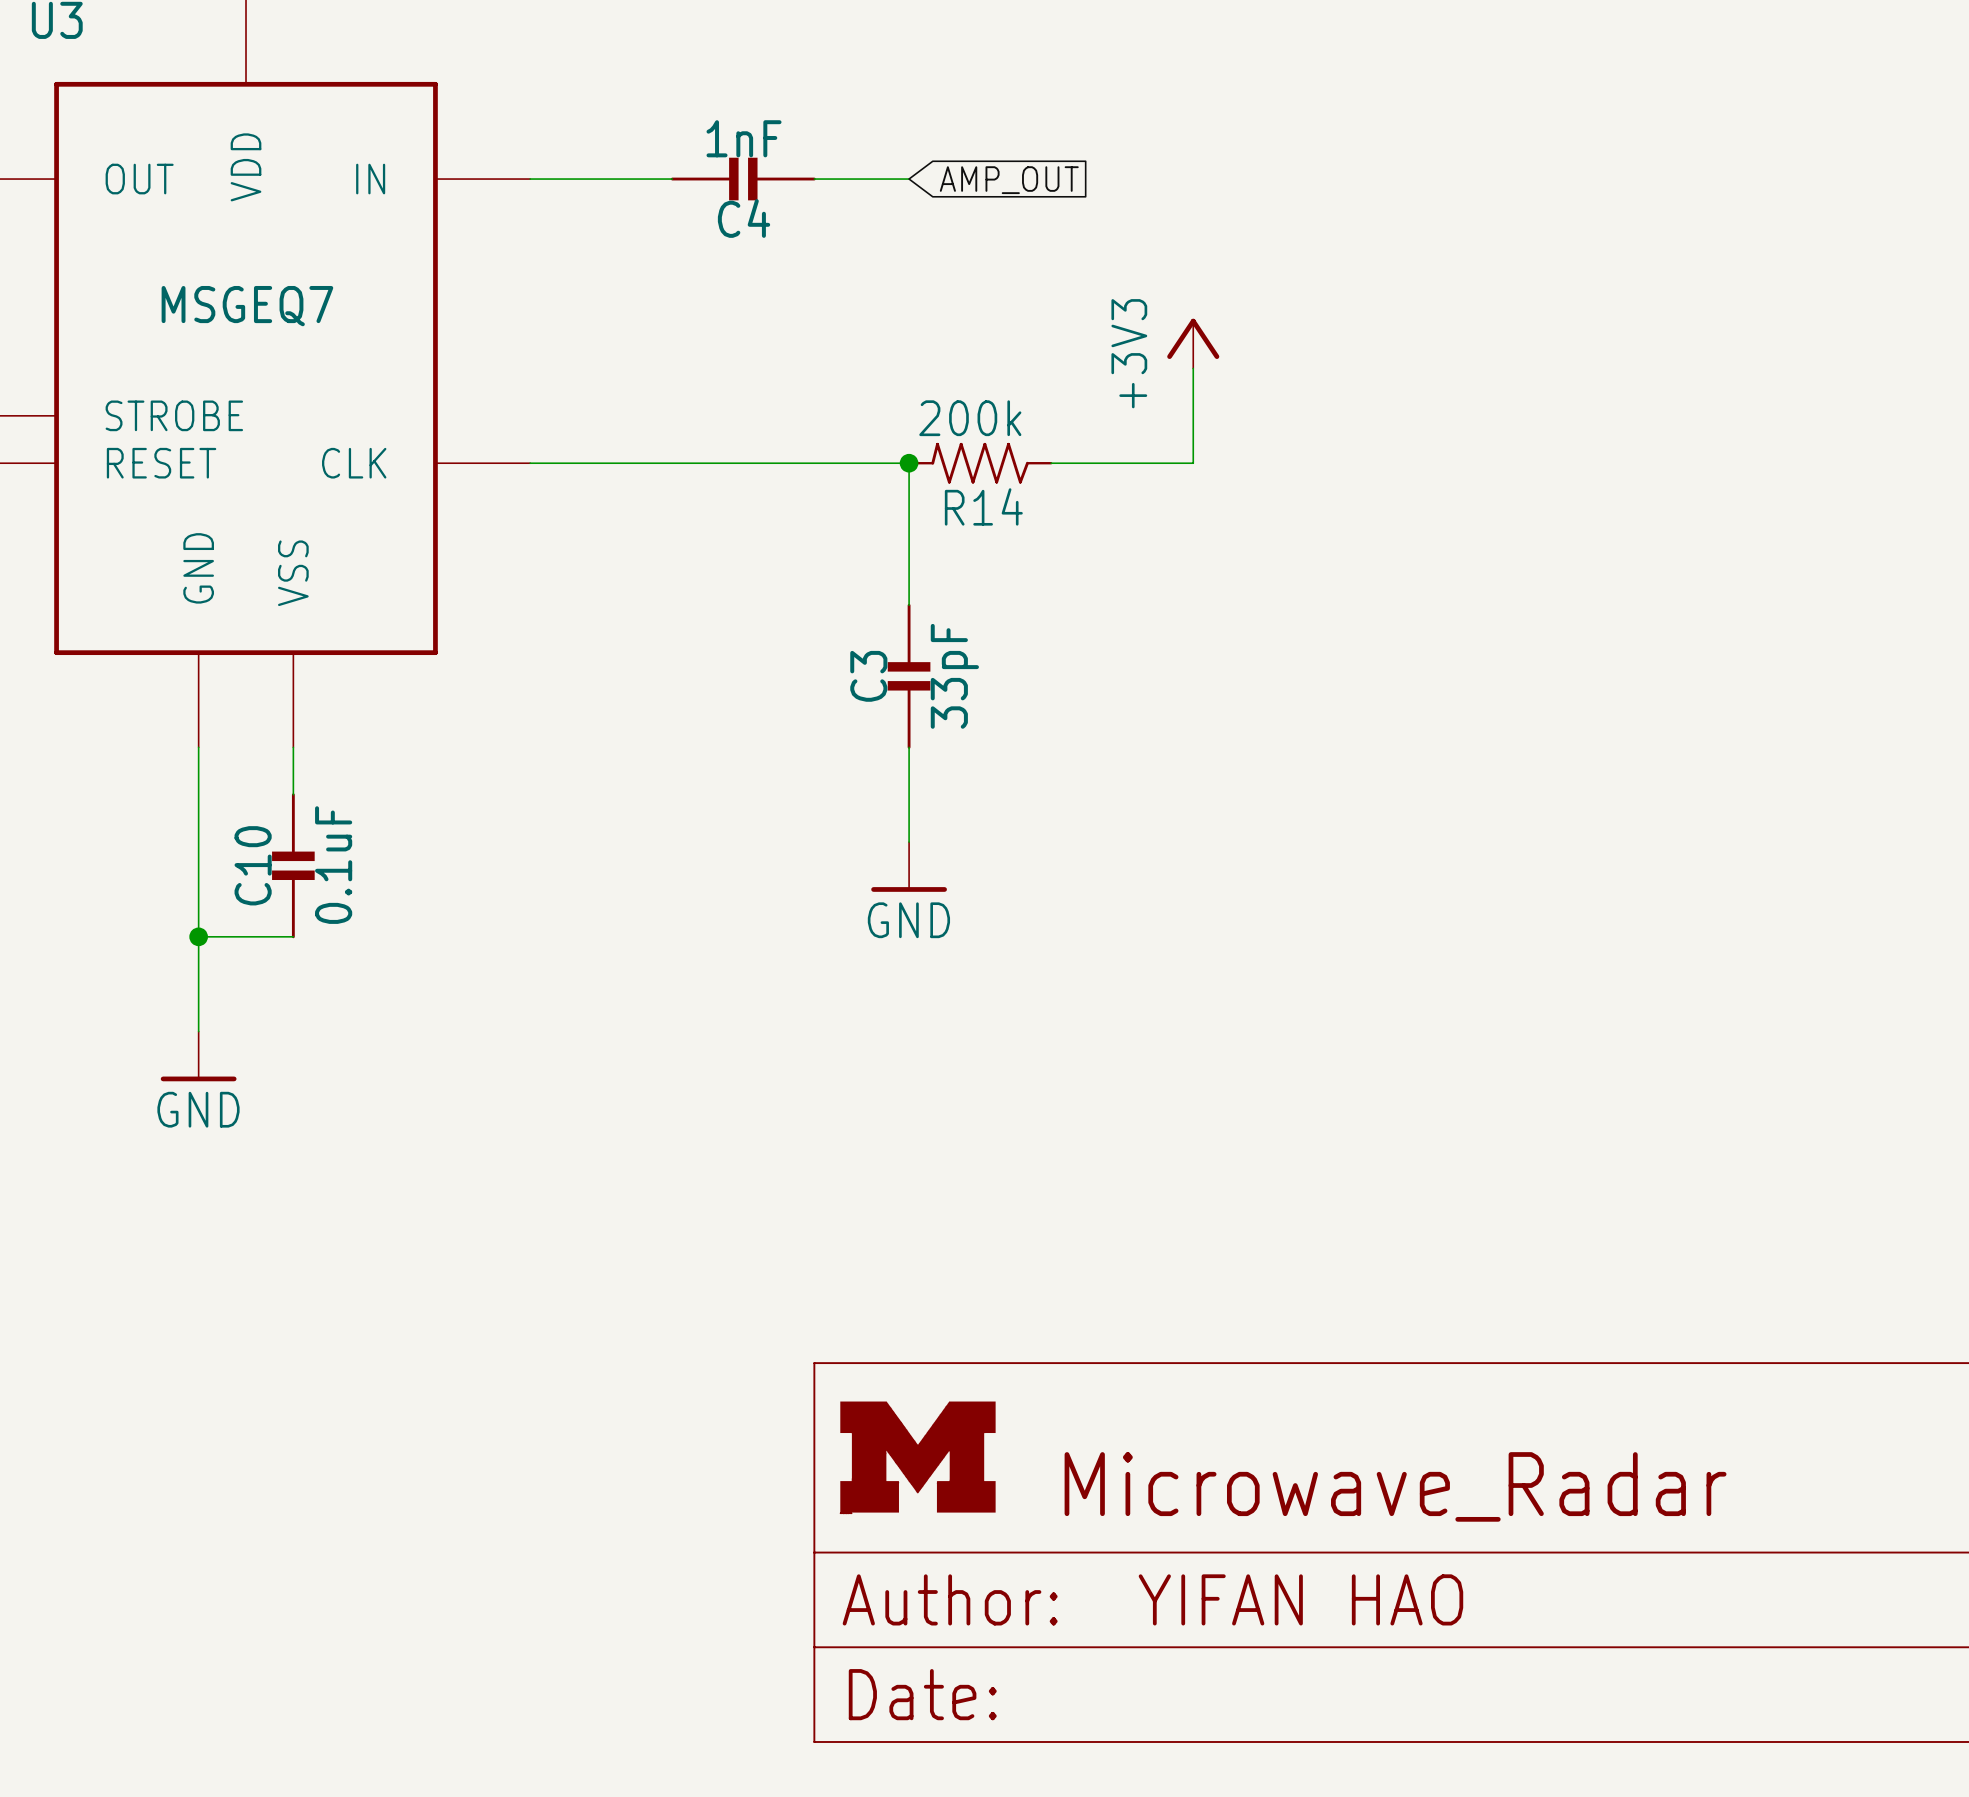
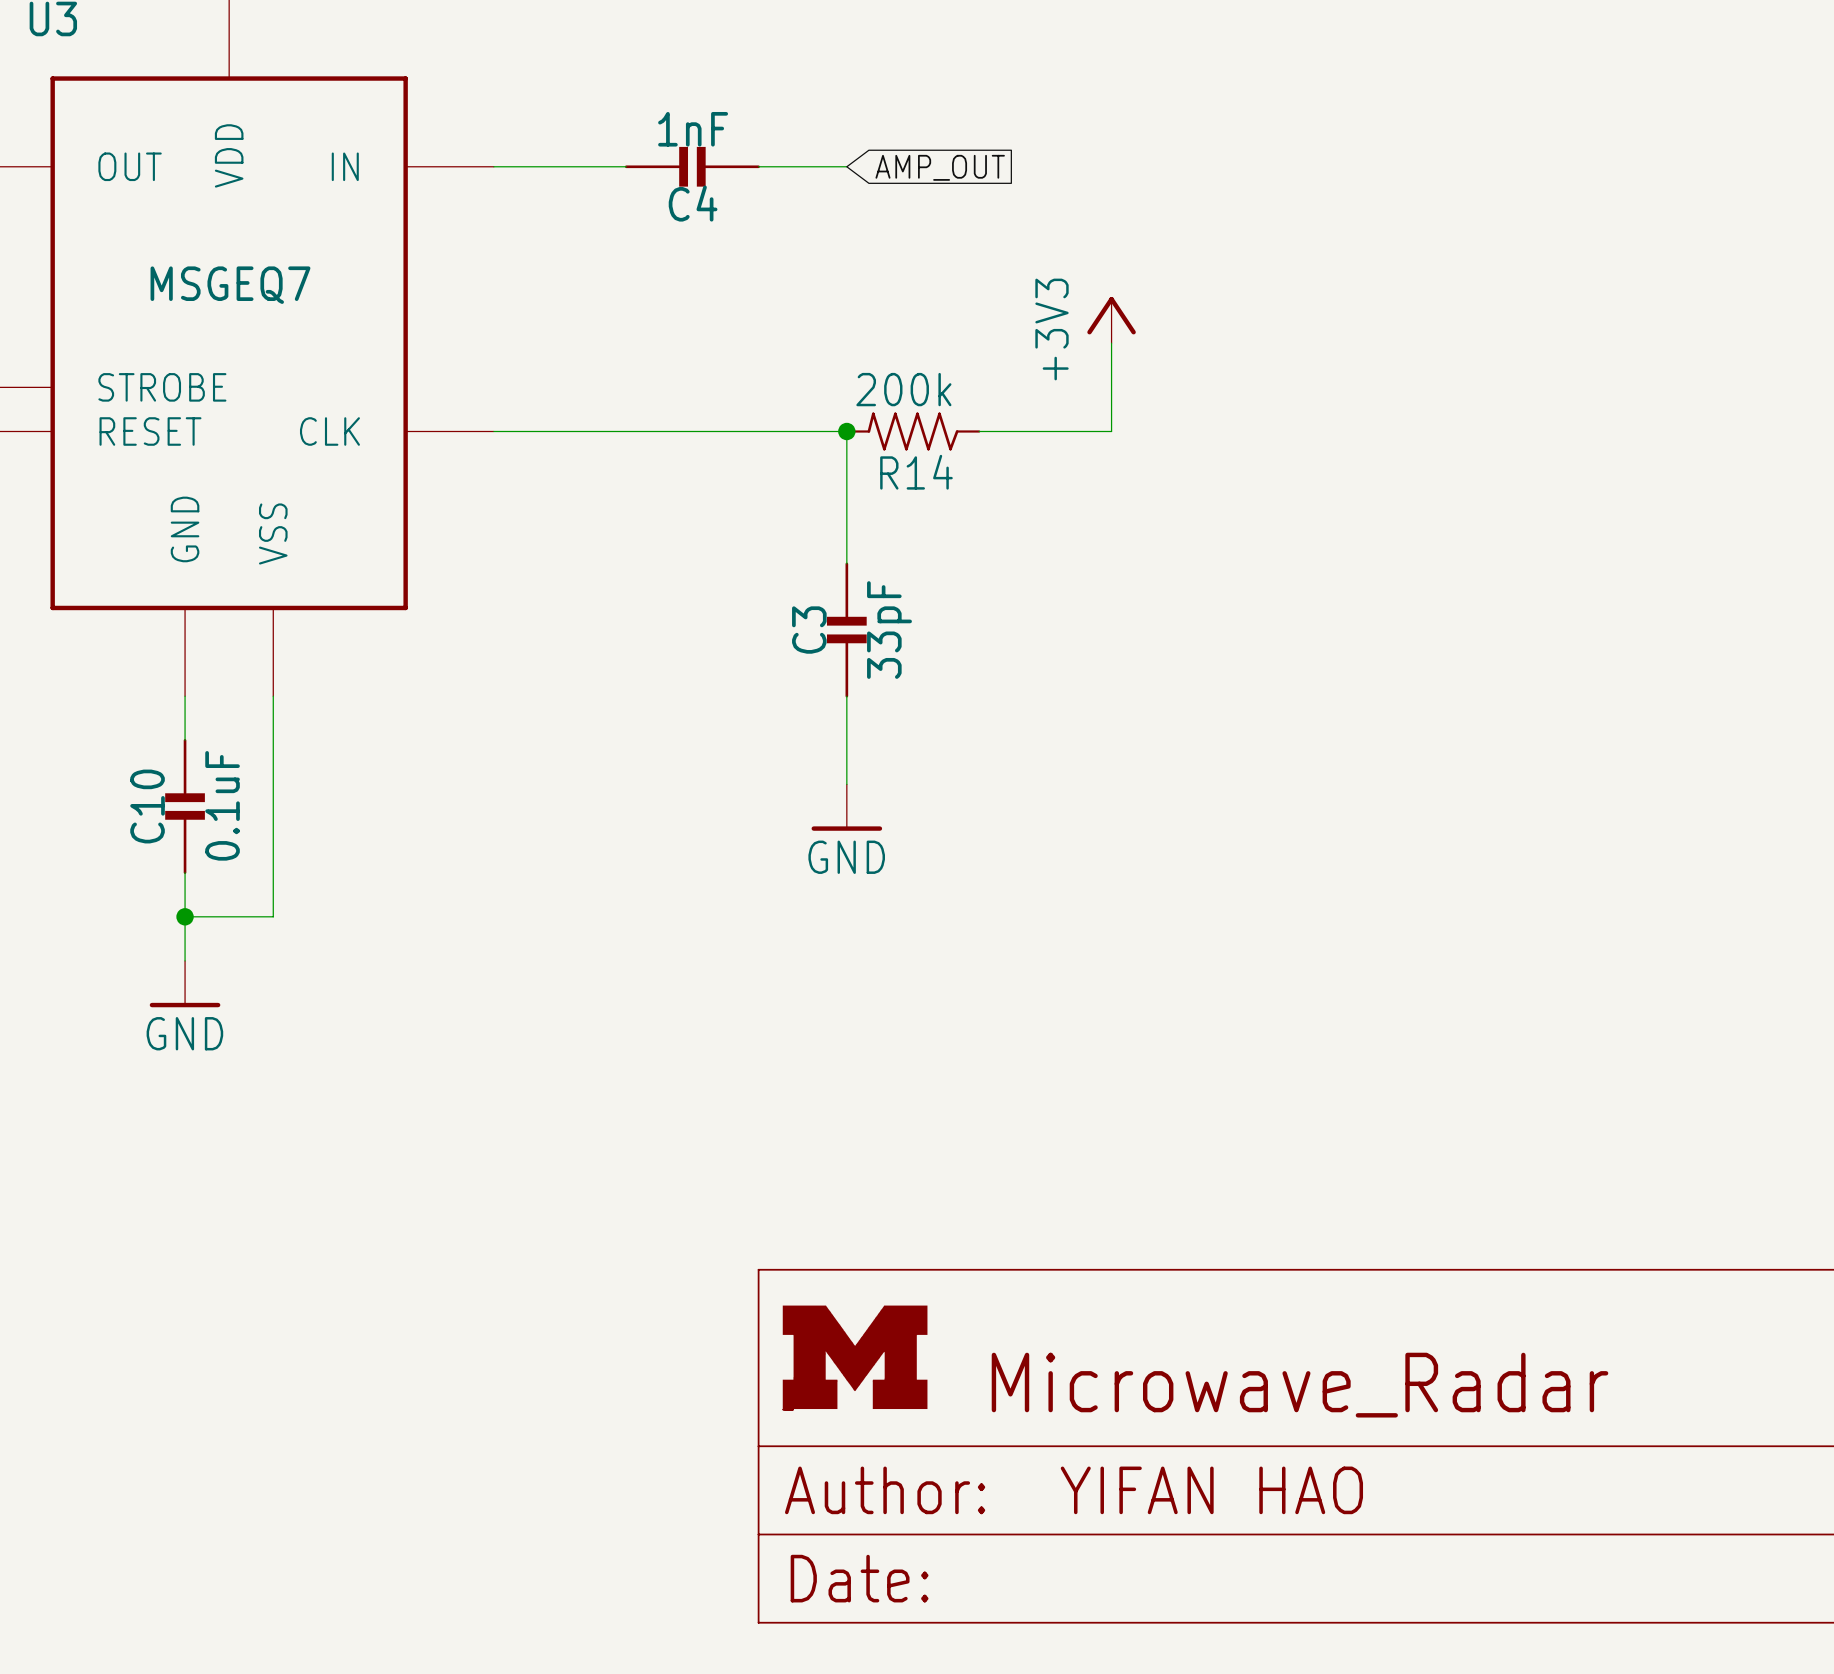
wire: (198, 794) (198, 936) (293, 936) -> none
wire: none -> (273, 740) (273, 916) (185, 916)
C10 position: (293, 865) -> (185, 806)
junction position: (198, 936) -> (185, 916)

